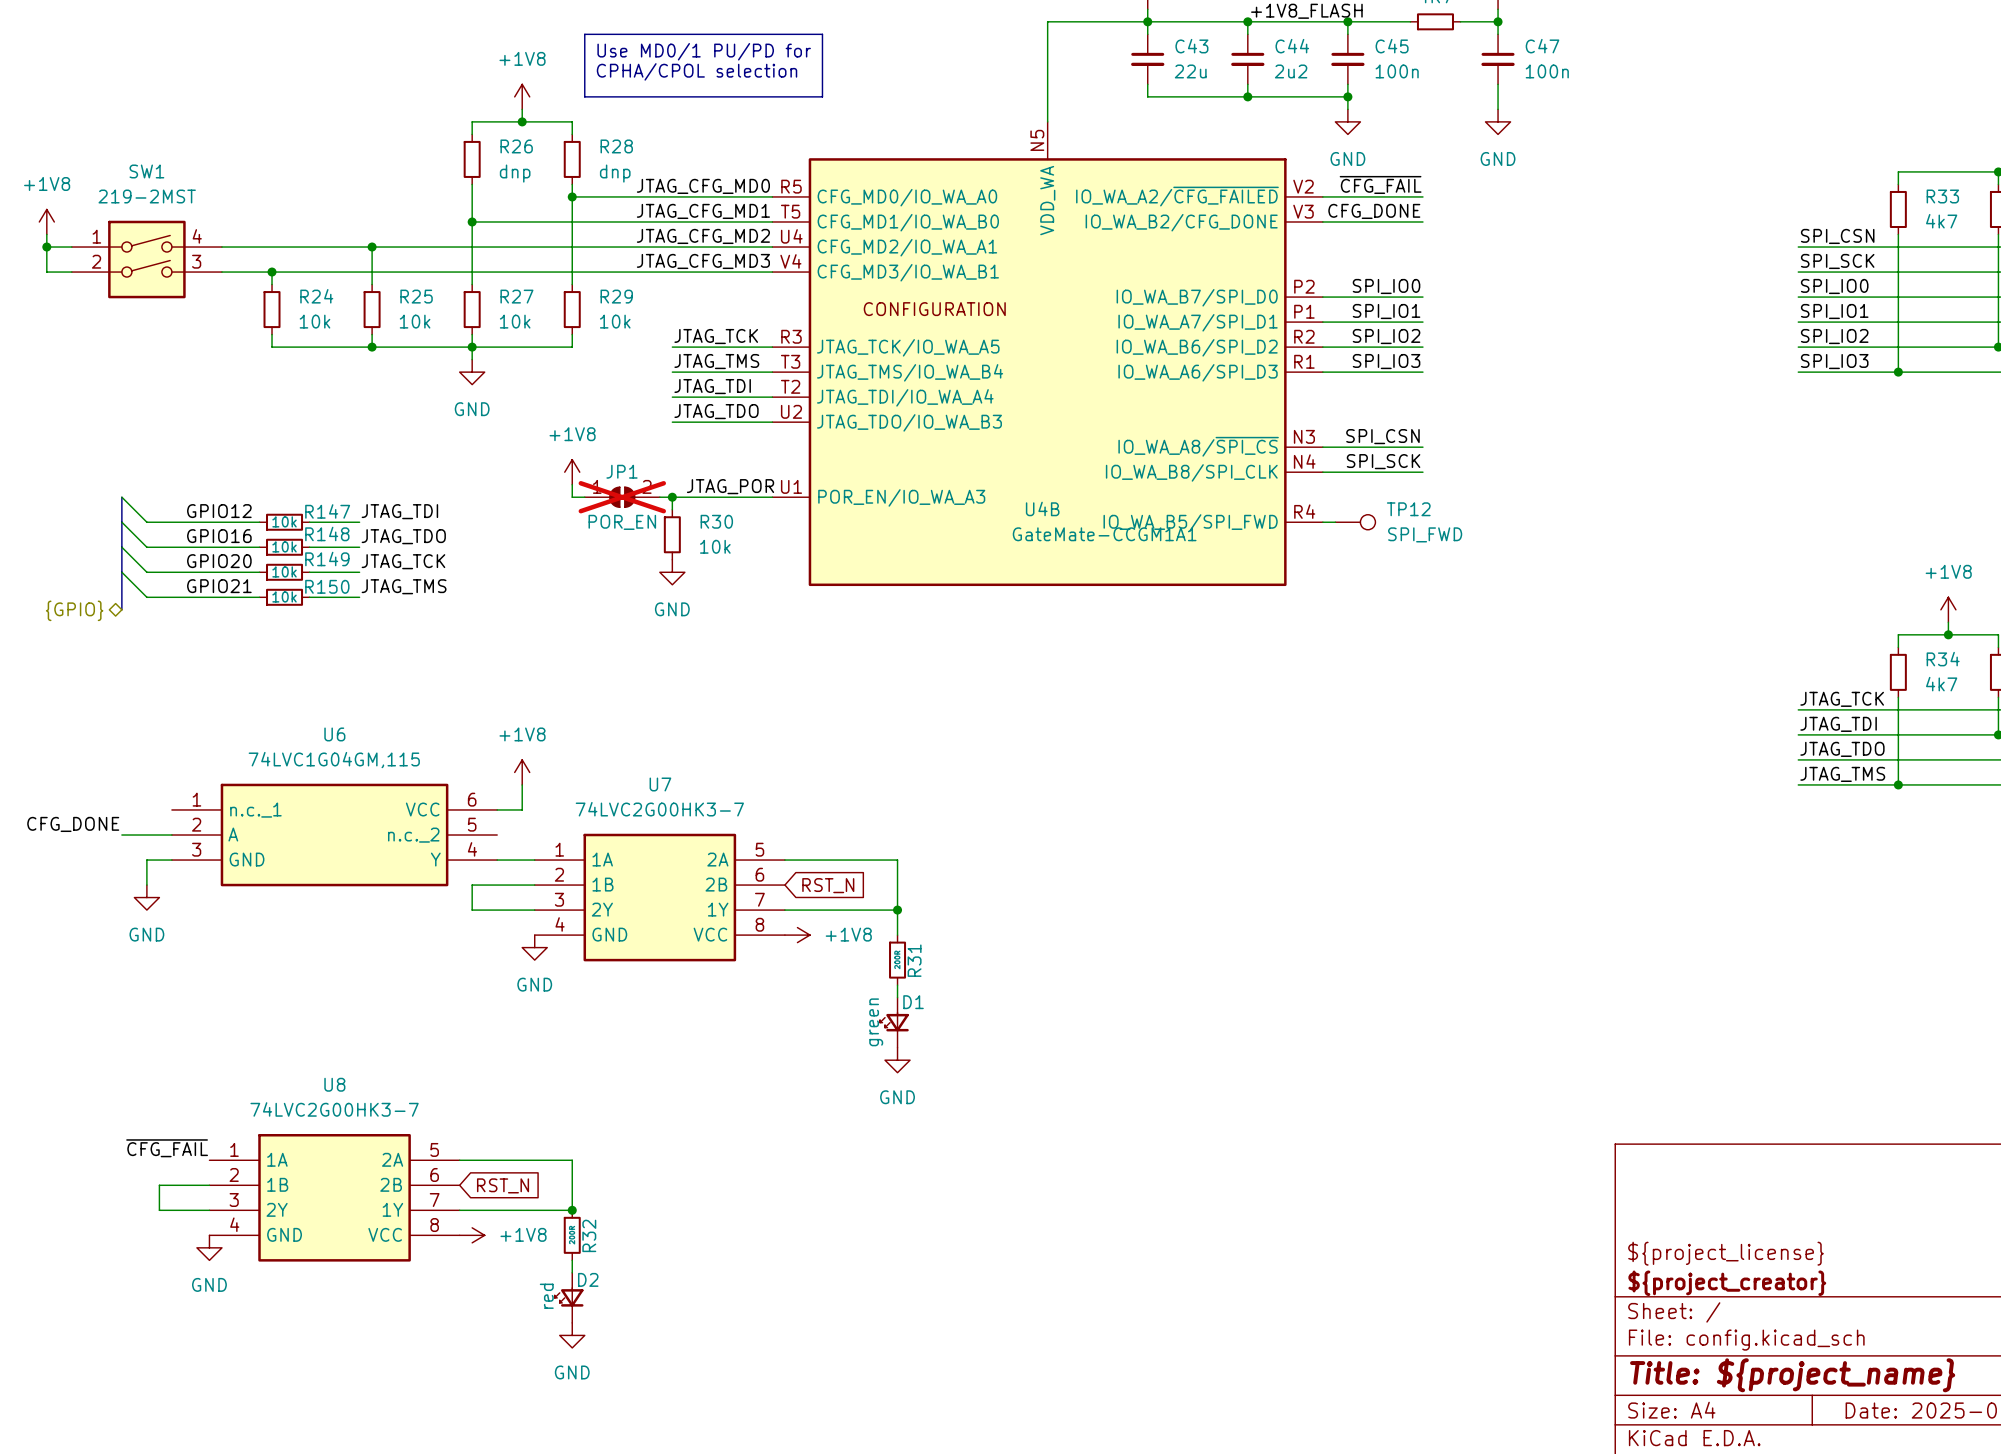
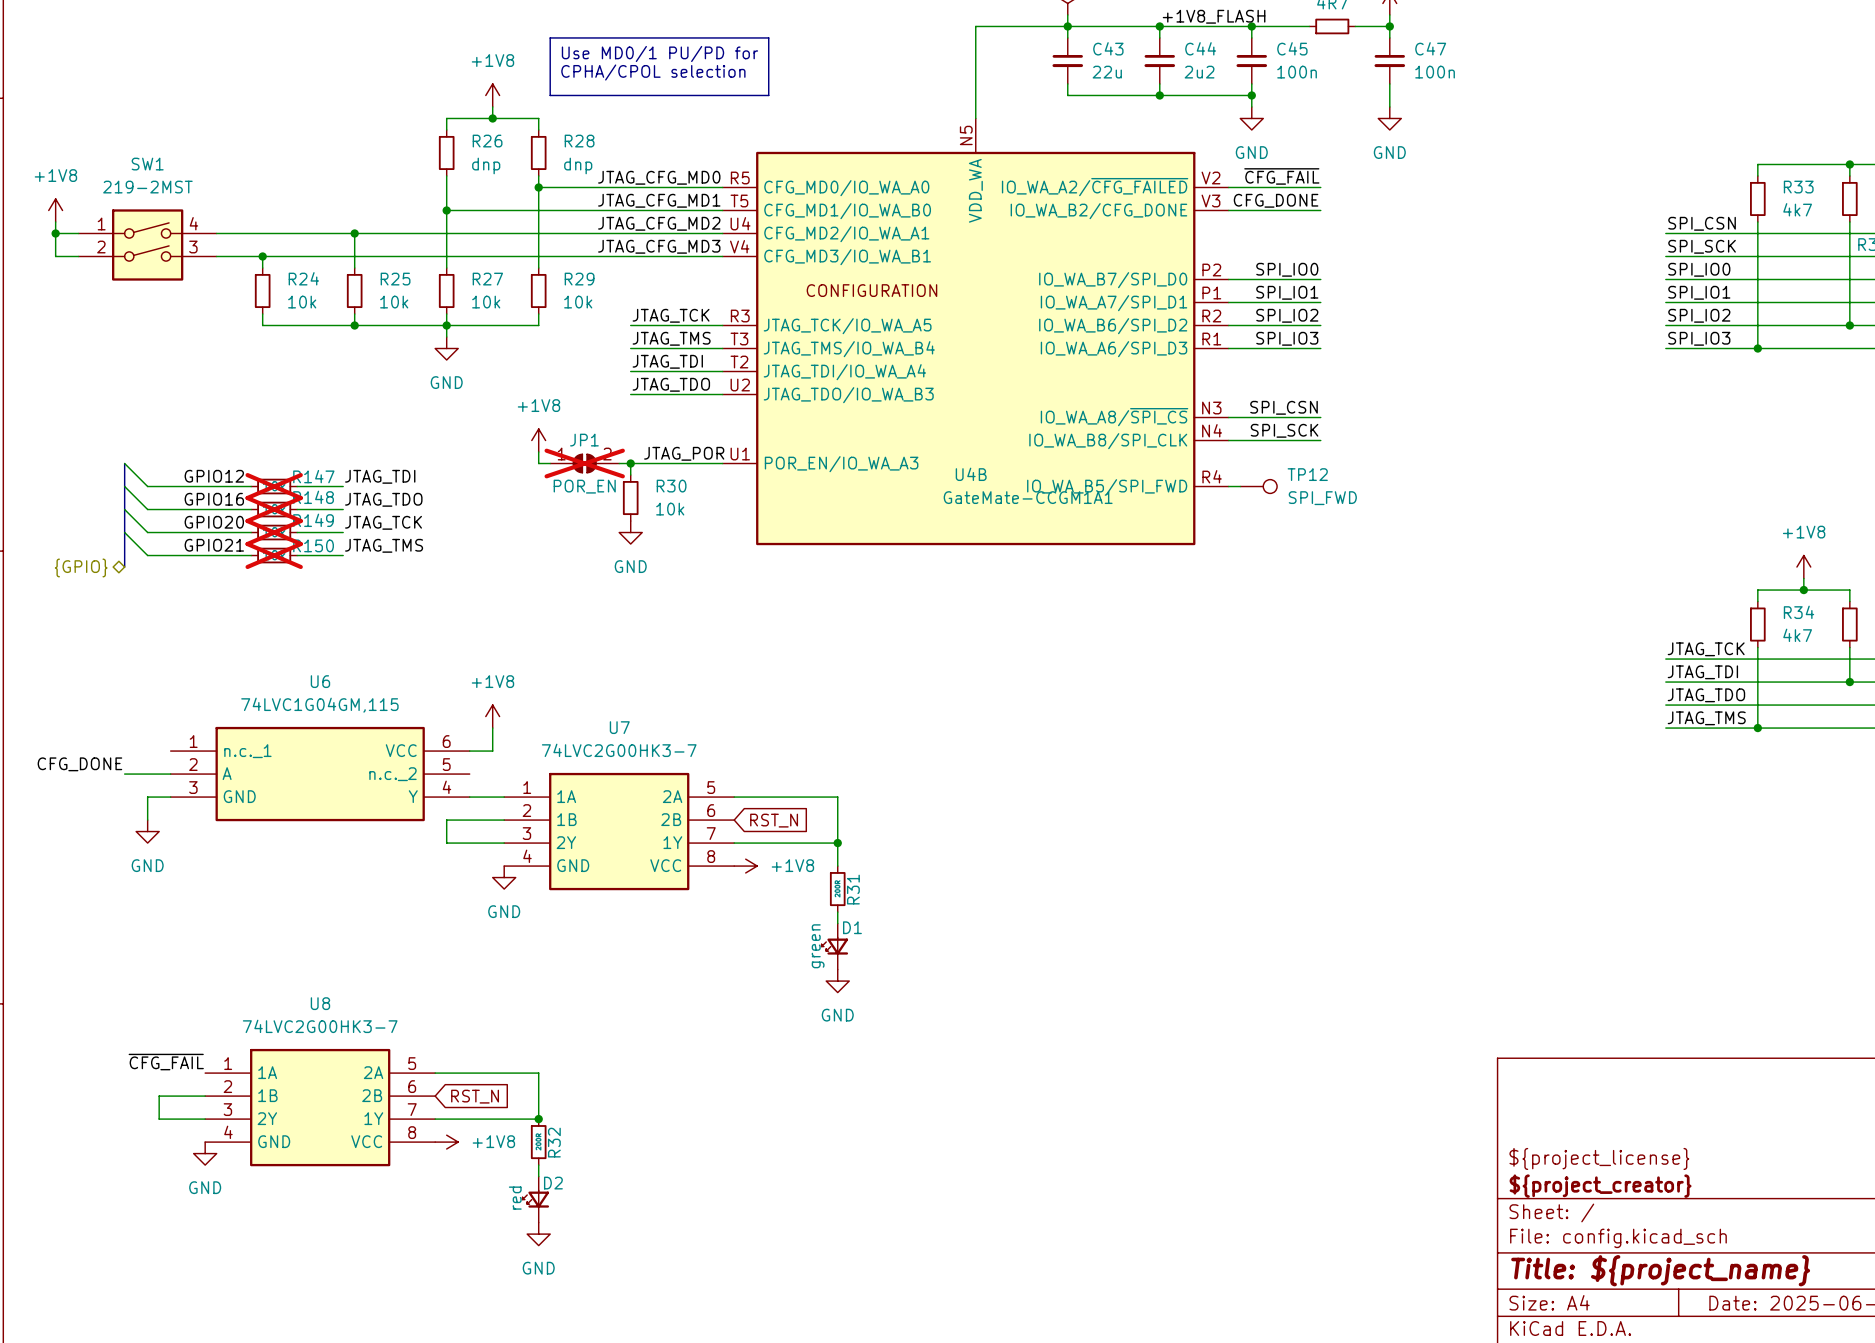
R147 do-not-place cross: none -> (274, 486)
R148 do-not-place cross: none -> (274, 509)
R149 do-not-place cross: none -> (274, 532)
R150 do-not-place cross: none -> (274, 555)

